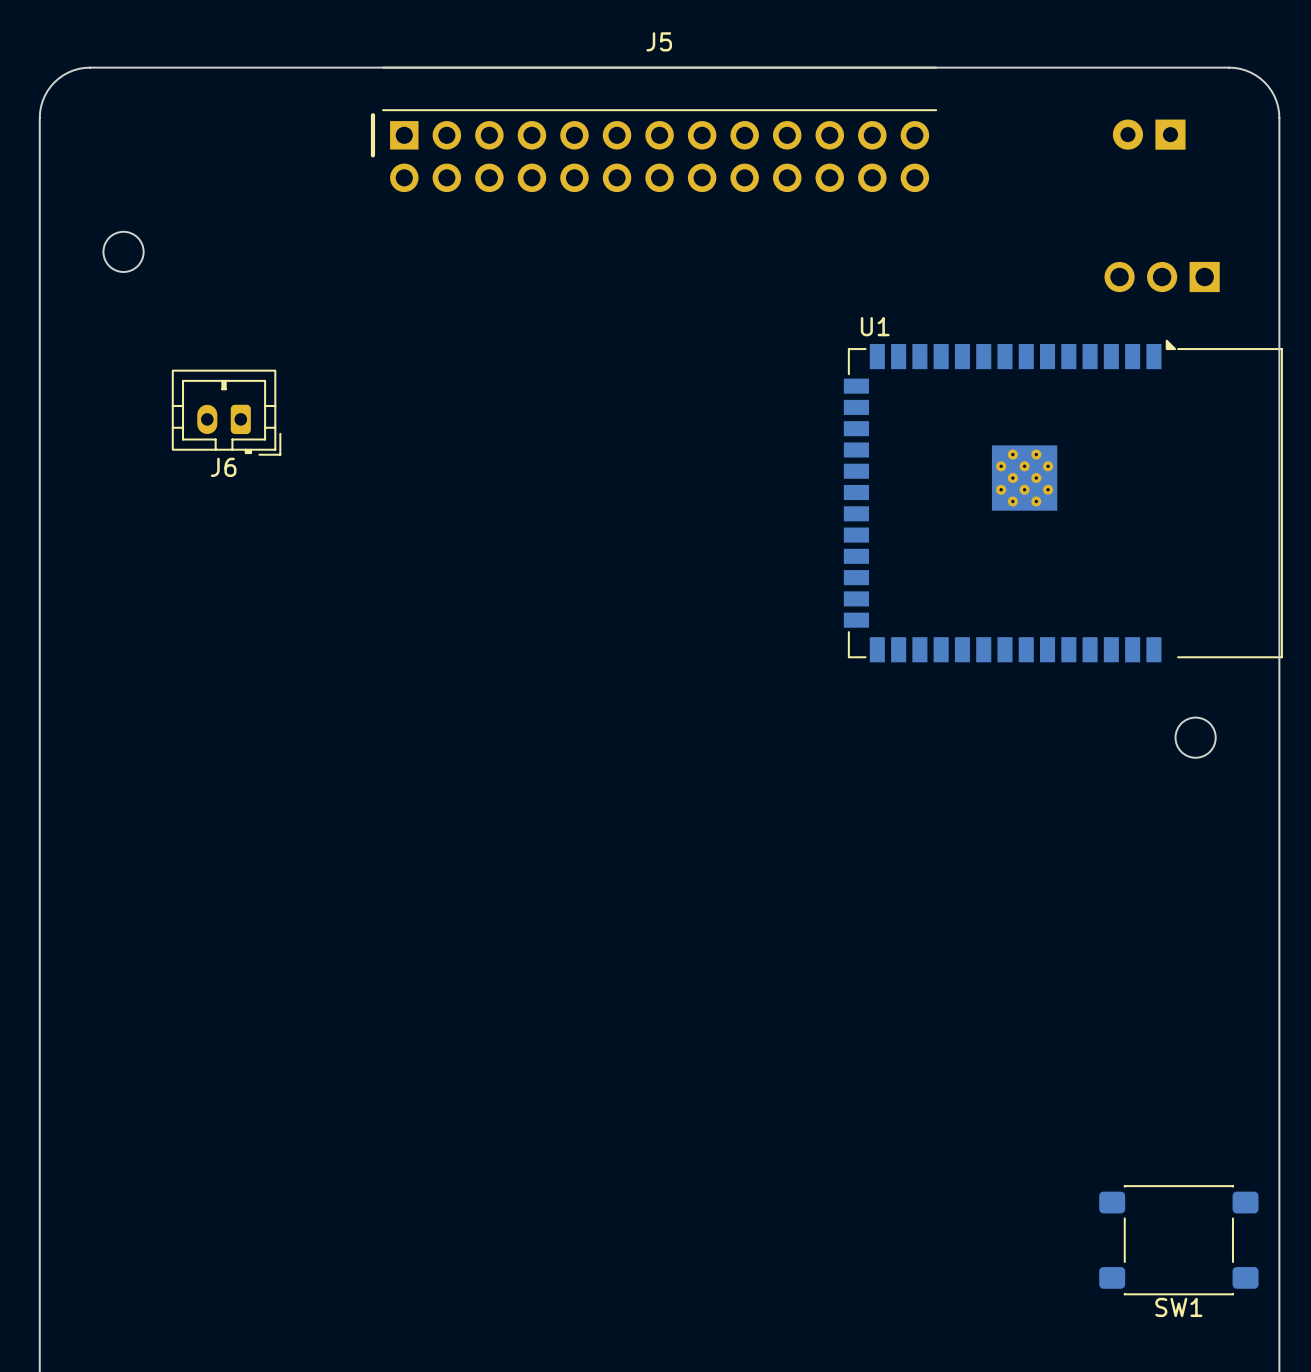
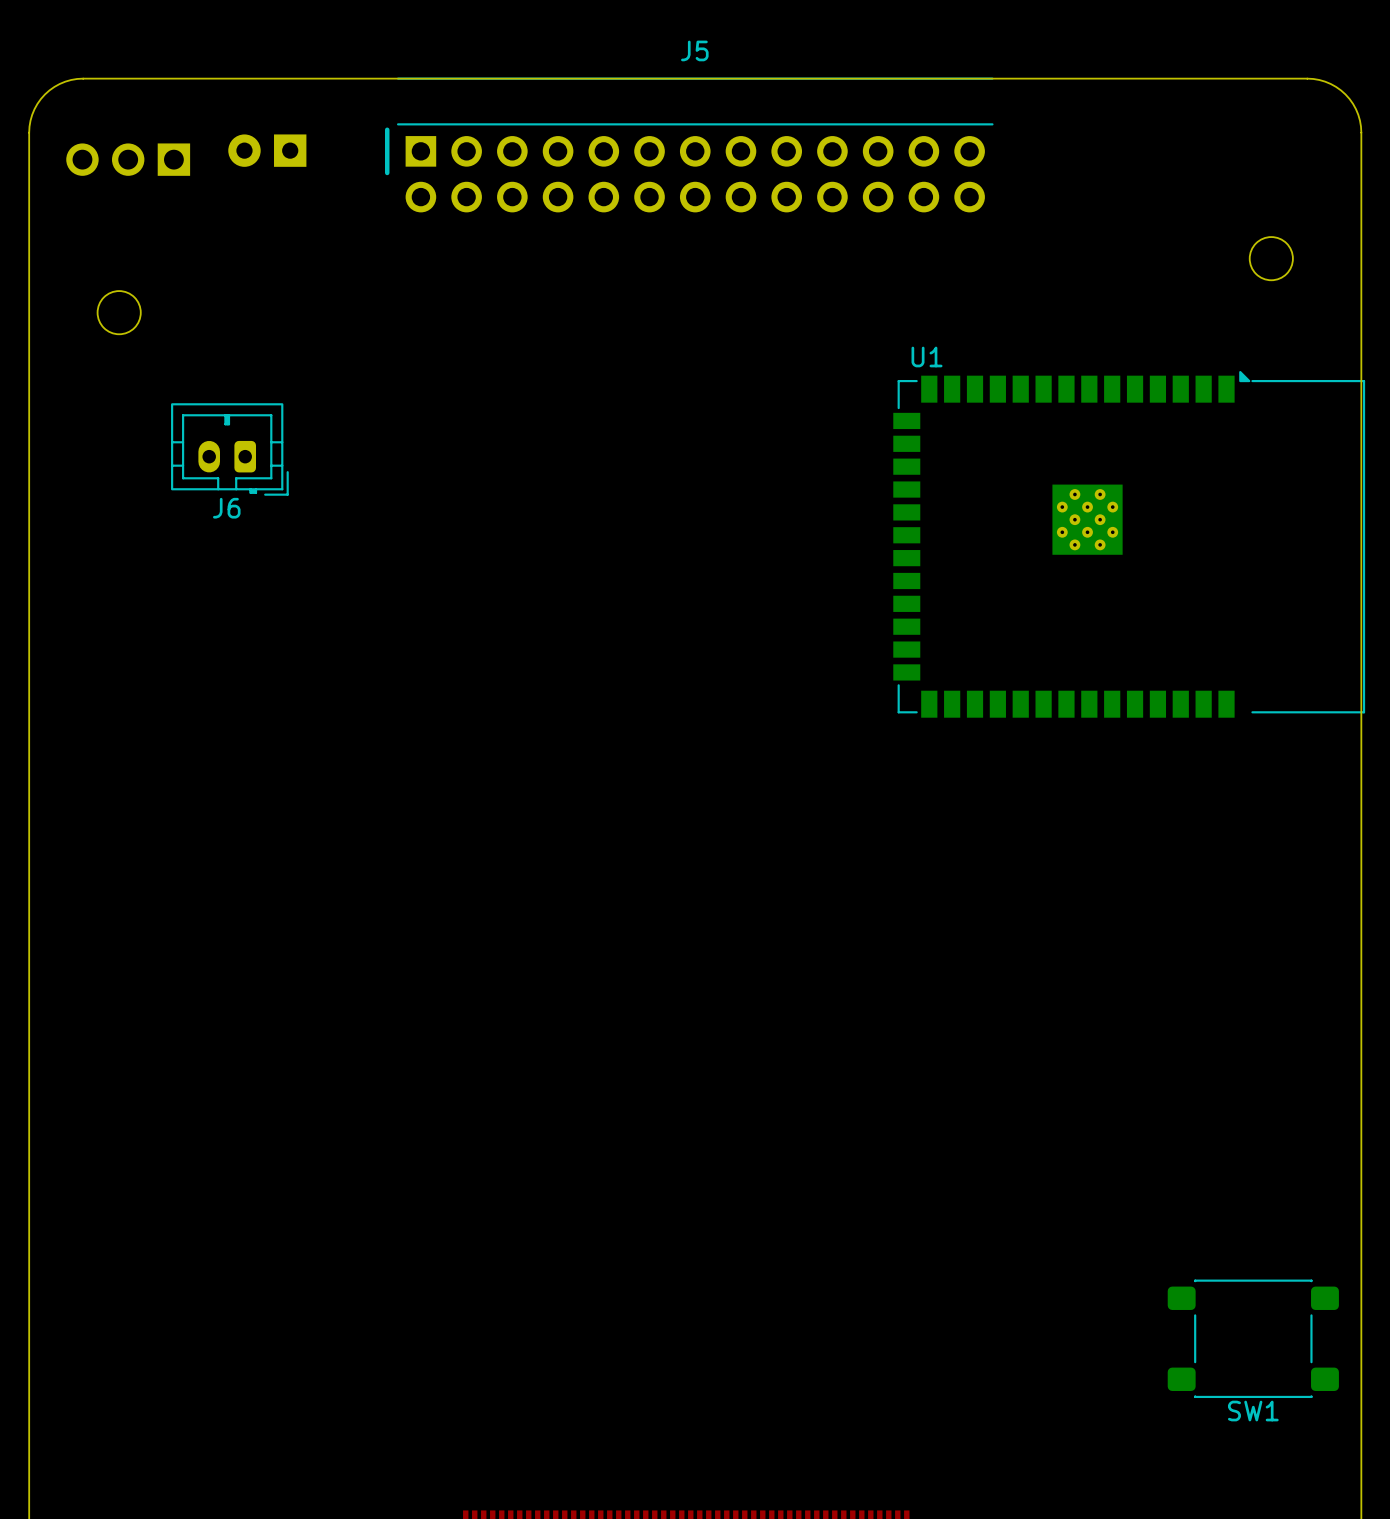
part: none -> (267, 150)
part: (1149, 134) -> none
part: none -> (128, 159)
round board edge: none -> [1248, 236, 1294, 282]
round board edge position: (123, 251) -> (119, 312)
part: (1162, 277) -> none
round board edge: [1174, 716, 1217, 759] -> none

